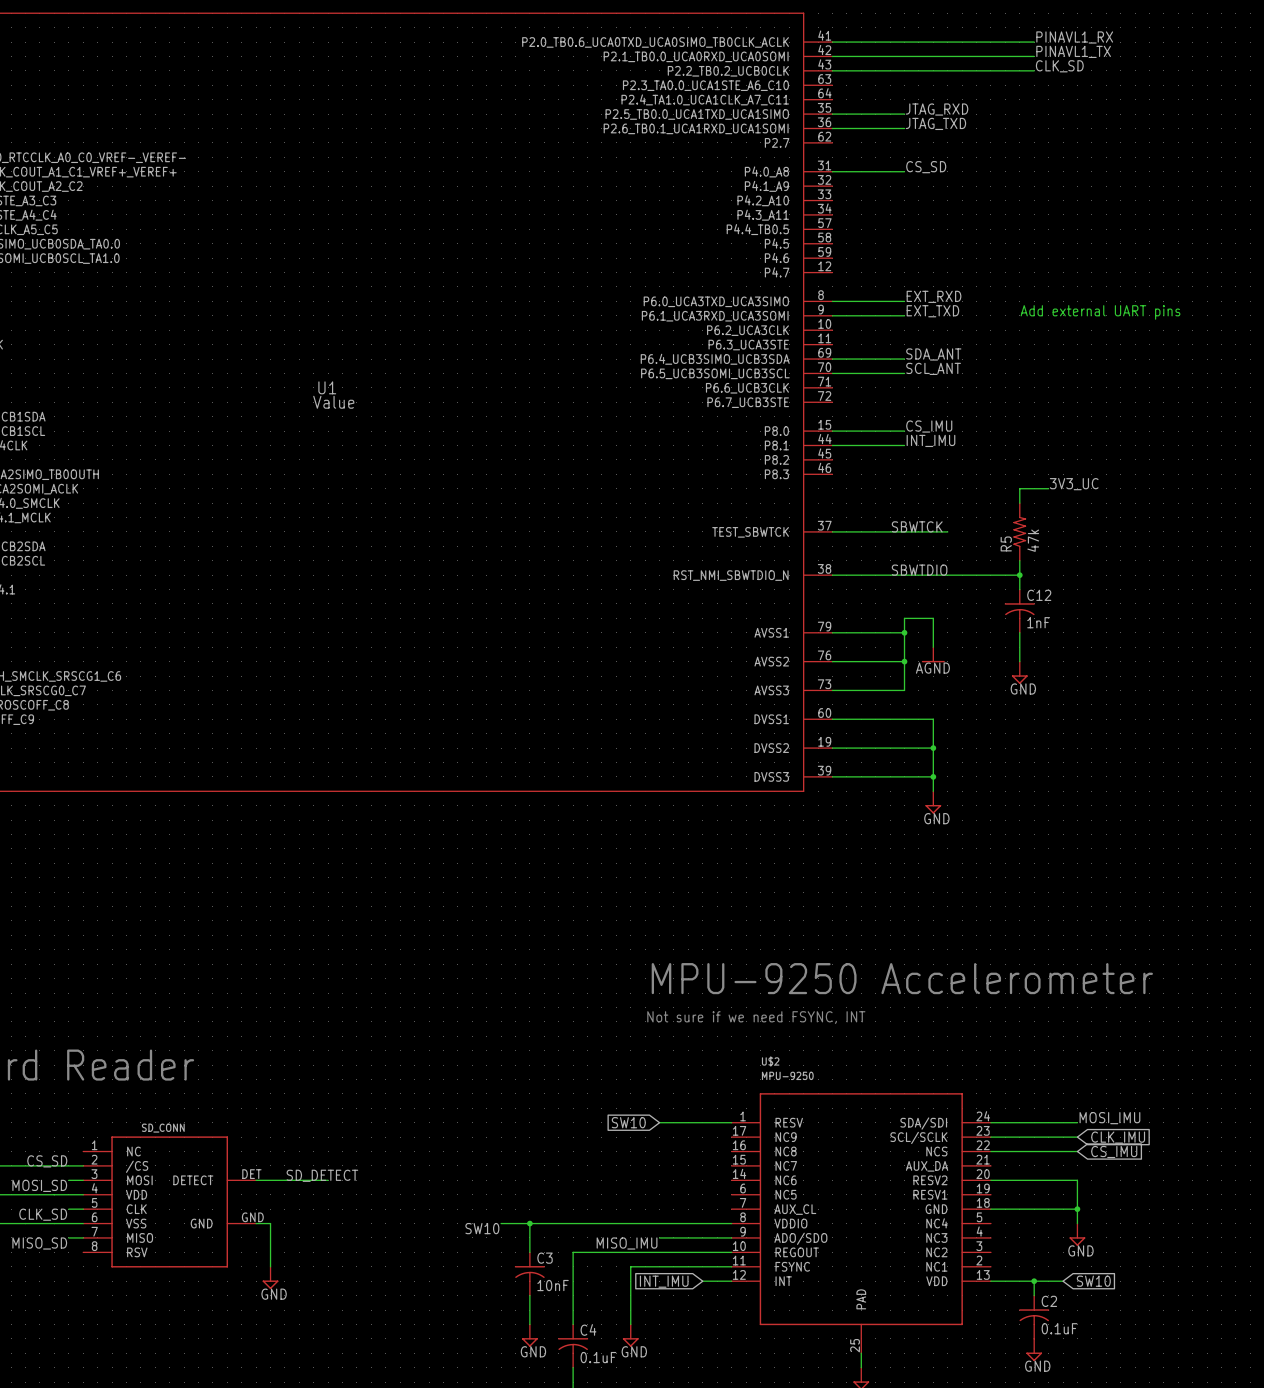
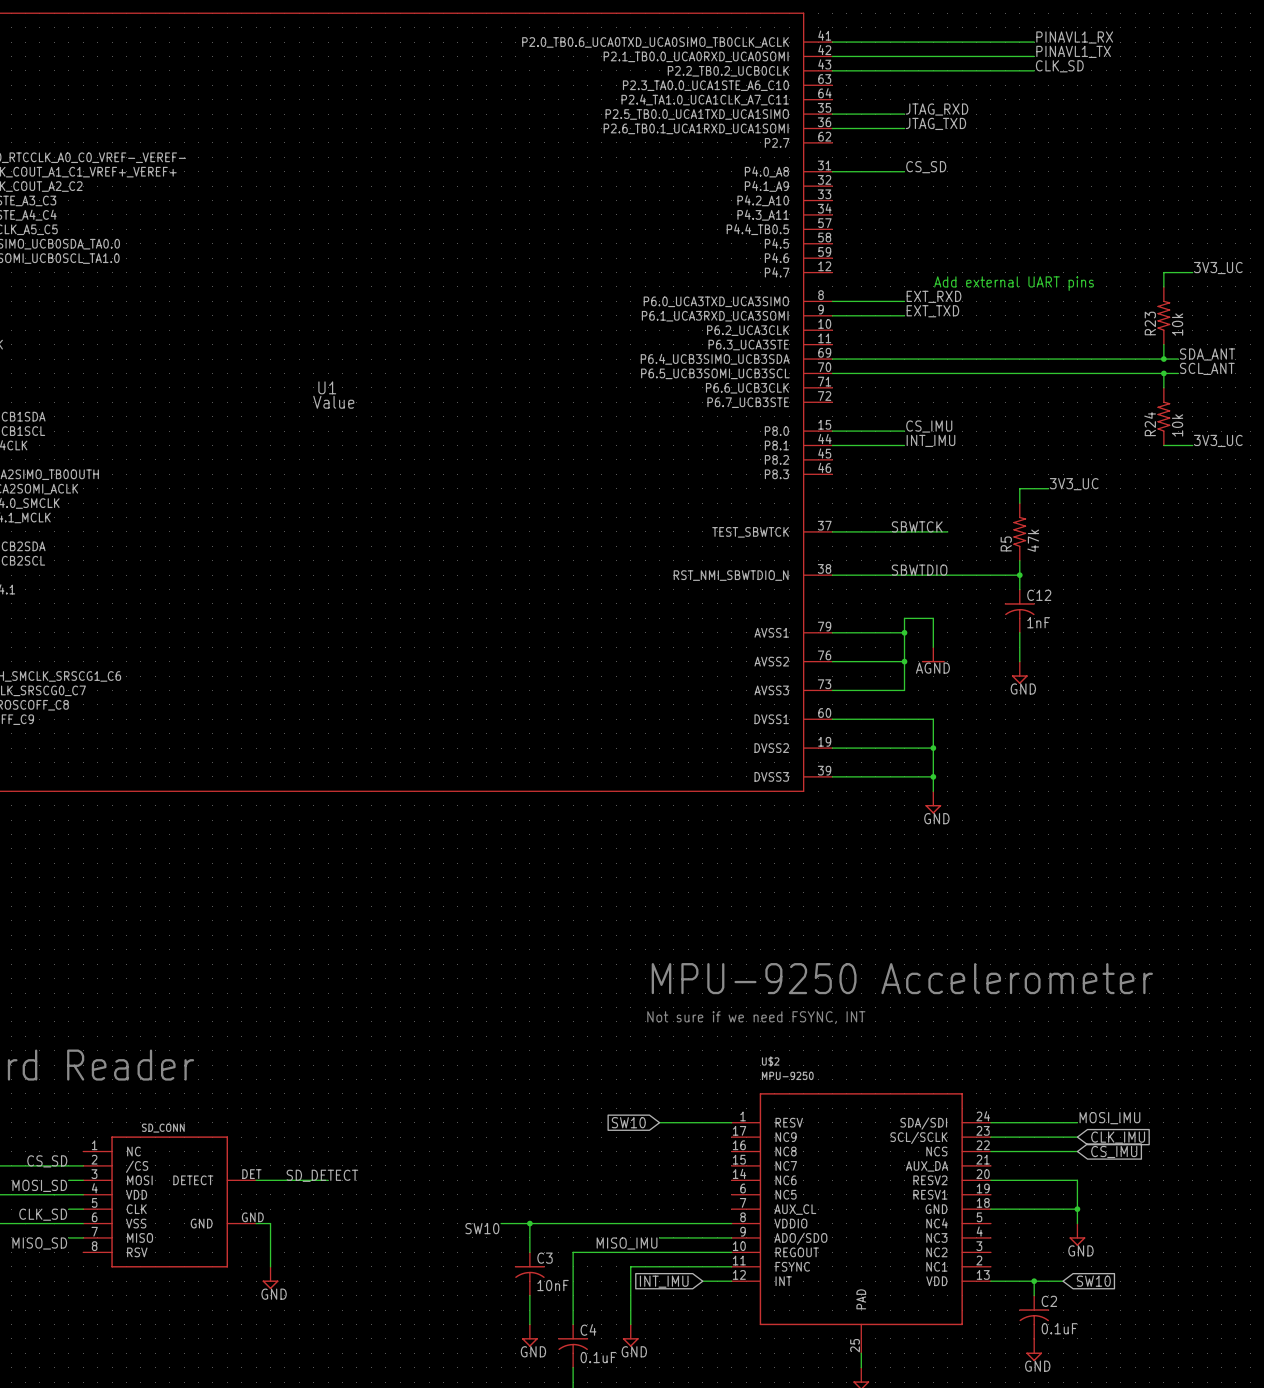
label: none -> 3V3_UC (1218, 268)
wire: none -> (1192, 272) (1163, 272) (1163, 286)
text position: Add external UART pins (1100, 312) -> Add external UART pins (1014, 283)
R23: none -> 10k (1163, 315)
wire: none -> (1163, 344) (1163, 359)
label: SDA_ANT (933, 354) -> none
label: none -> SDA_ANT (1207, 354)
wire: none -> (904, 359) (1178, 359)
junction: none -> (1163, 359)
label: SCL_ANT (933, 368) -> none
label: none -> SCL_ANT (1207, 368)
wire: none -> (904, 373) (1178, 373)
wire: none -> (1163, 373) (1163, 387)
junction: none -> (1163, 373)
R24: none -> 10k (1163, 416)
label: none -> 3V3_UC (1218, 440)
wire: none -> (1163, 445) (1192, 445)

